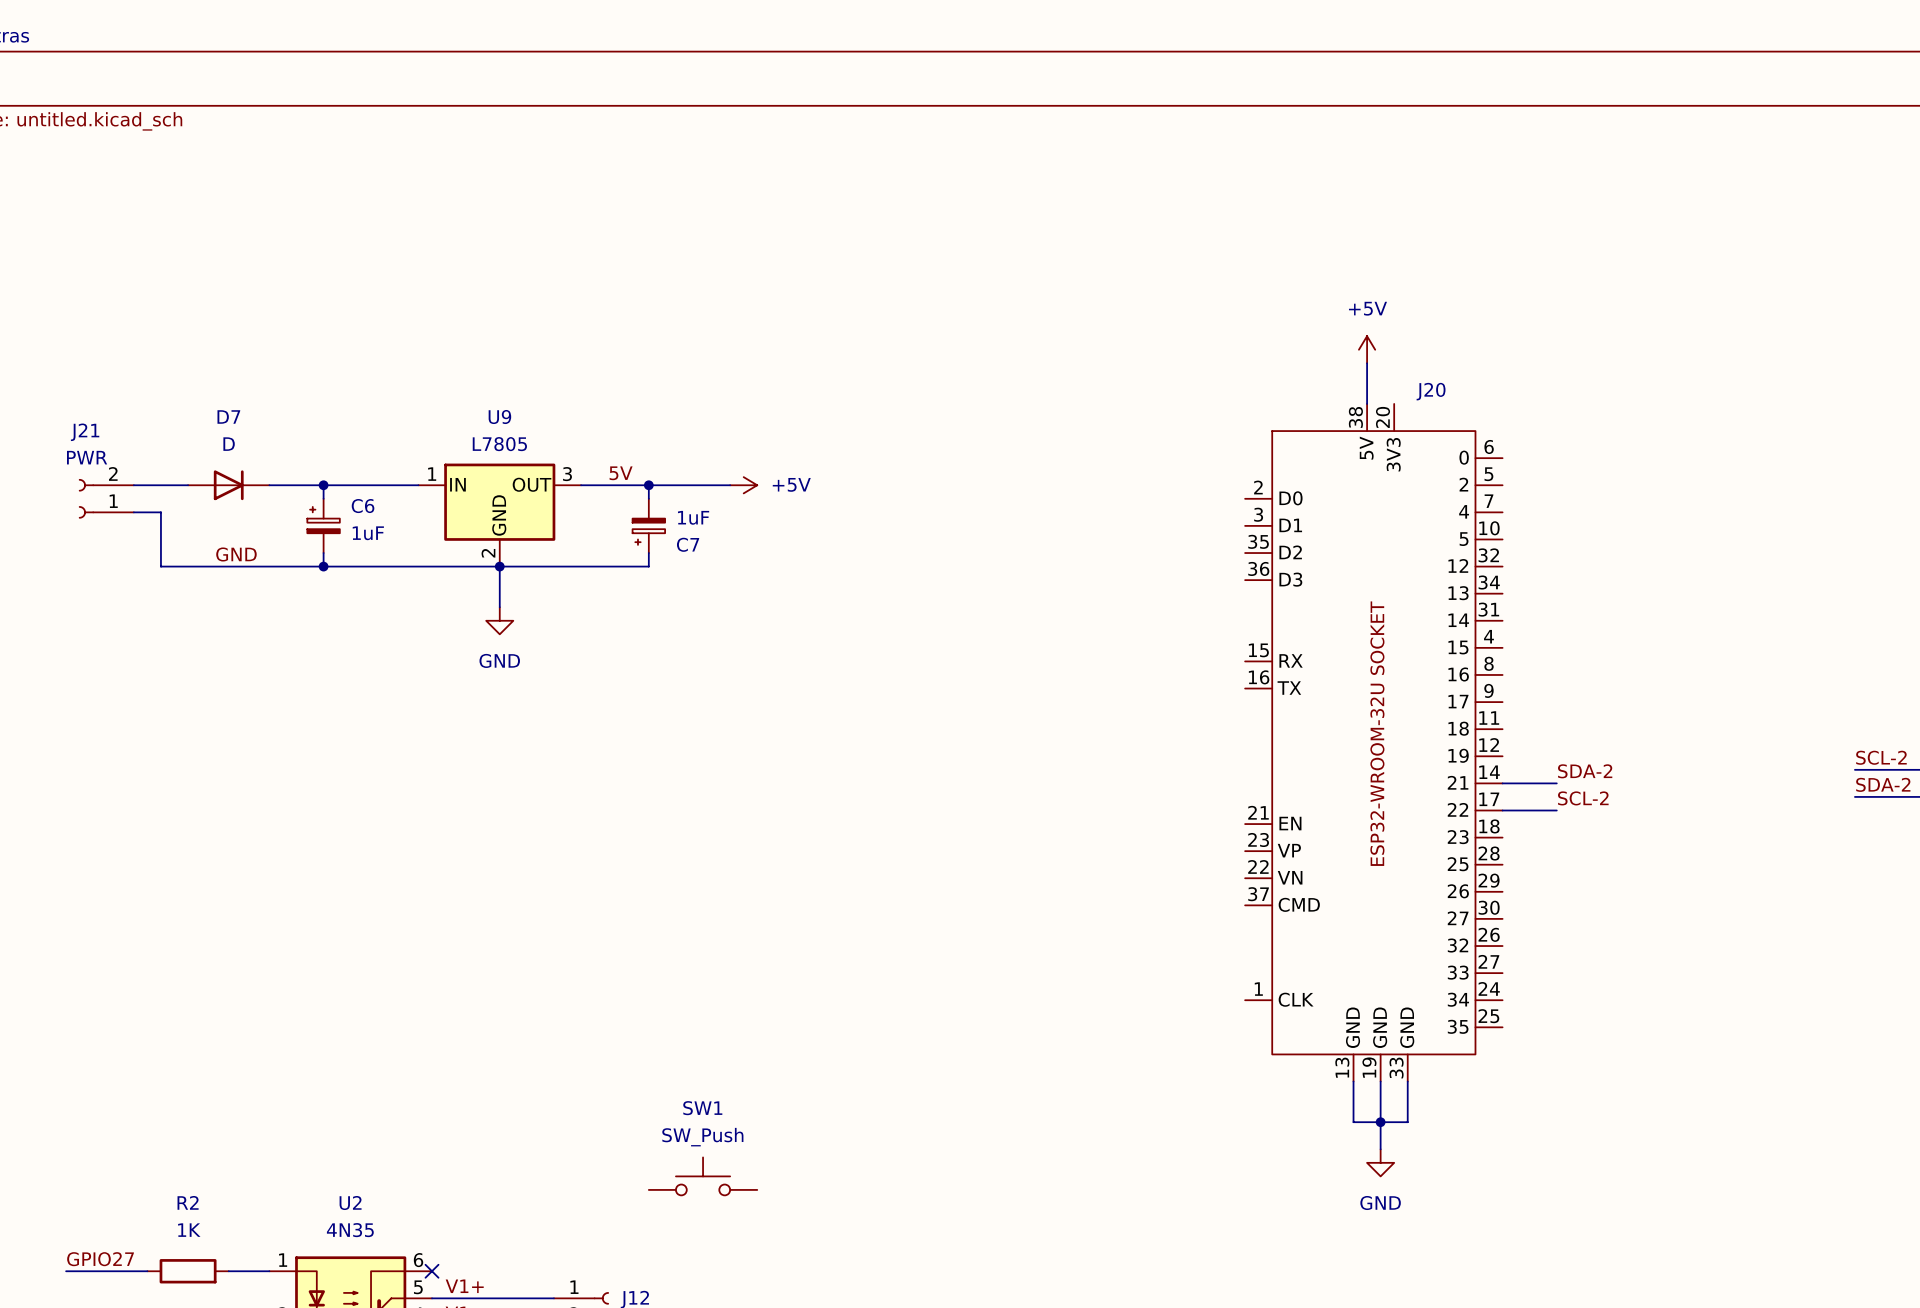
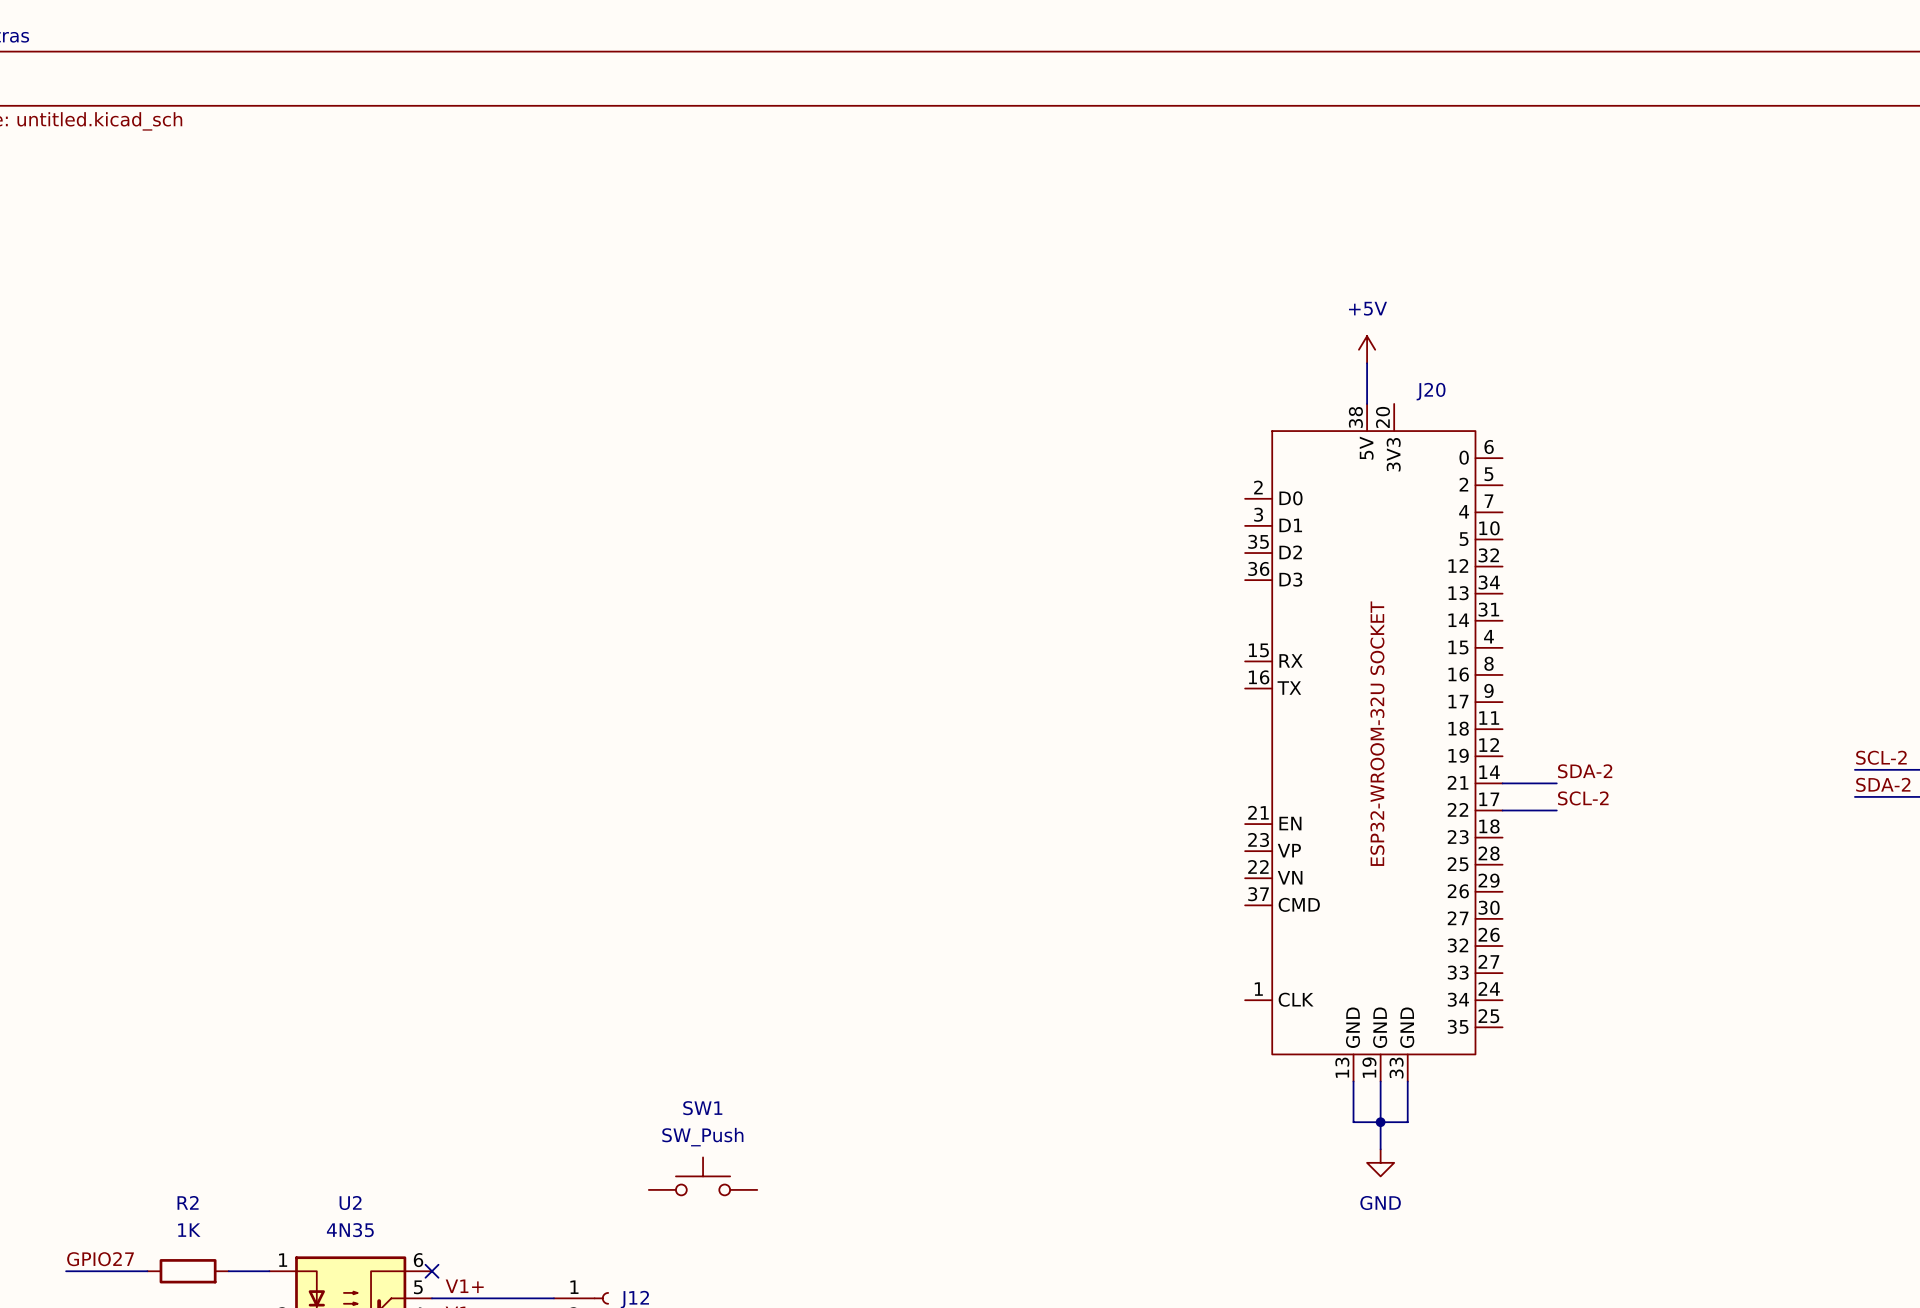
label: 5V (621, 473) -> none
wire: (133, 485) (188, 485) -> none
D7: D (228, 485) -> none
wire: (269, 485) (418, 485) -> none
wire: (323, 485) (323, 498) -> none
junction: (323, 485) -> none
wire: (581, 485) (730, 485) -> none
wire: (648, 485) (648, 498) -> none
junction: (648, 485) -> none
power symbol: +5V (743, 485) -> none
J21: PWR (106, 498) -> none
wire: (133, 512) (160, 512) (160, 566) (648, 566) (648, 553) -> none
U9: L7805 (499, 515) -> none
C6: 1uF (323, 525) -> none
C7: 1uF (648, 525) -> none
wire: (323, 553) (323, 566) -> none
label: GND (236, 554) -> none
junction: (323, 566) -> none
wire: (499, 566) (499, 607) -> none
junction: (499, 566) -> none
power symbol: GND (499, 620) -> none

